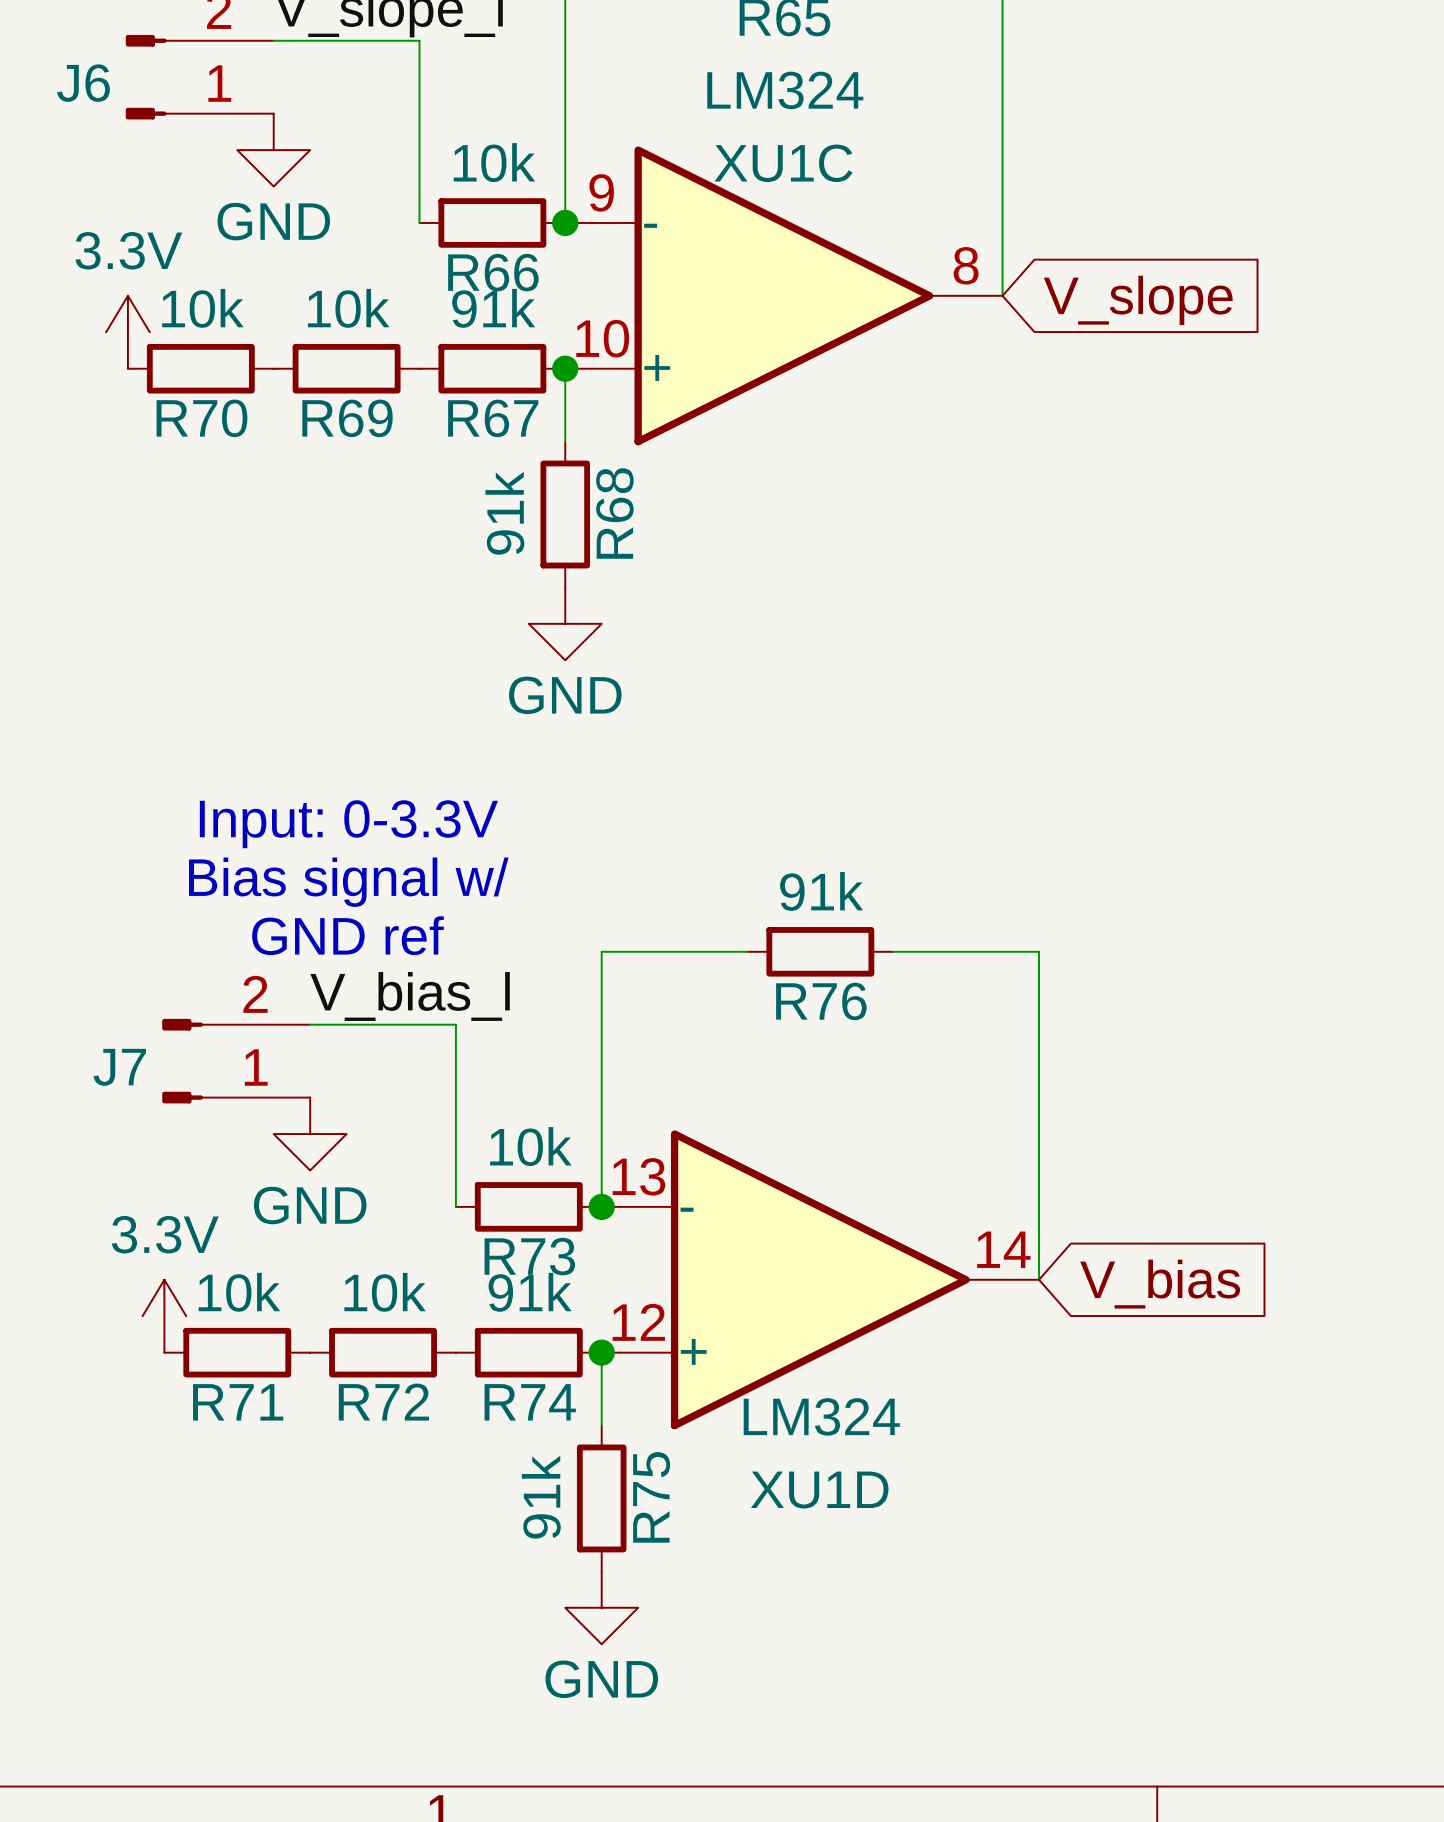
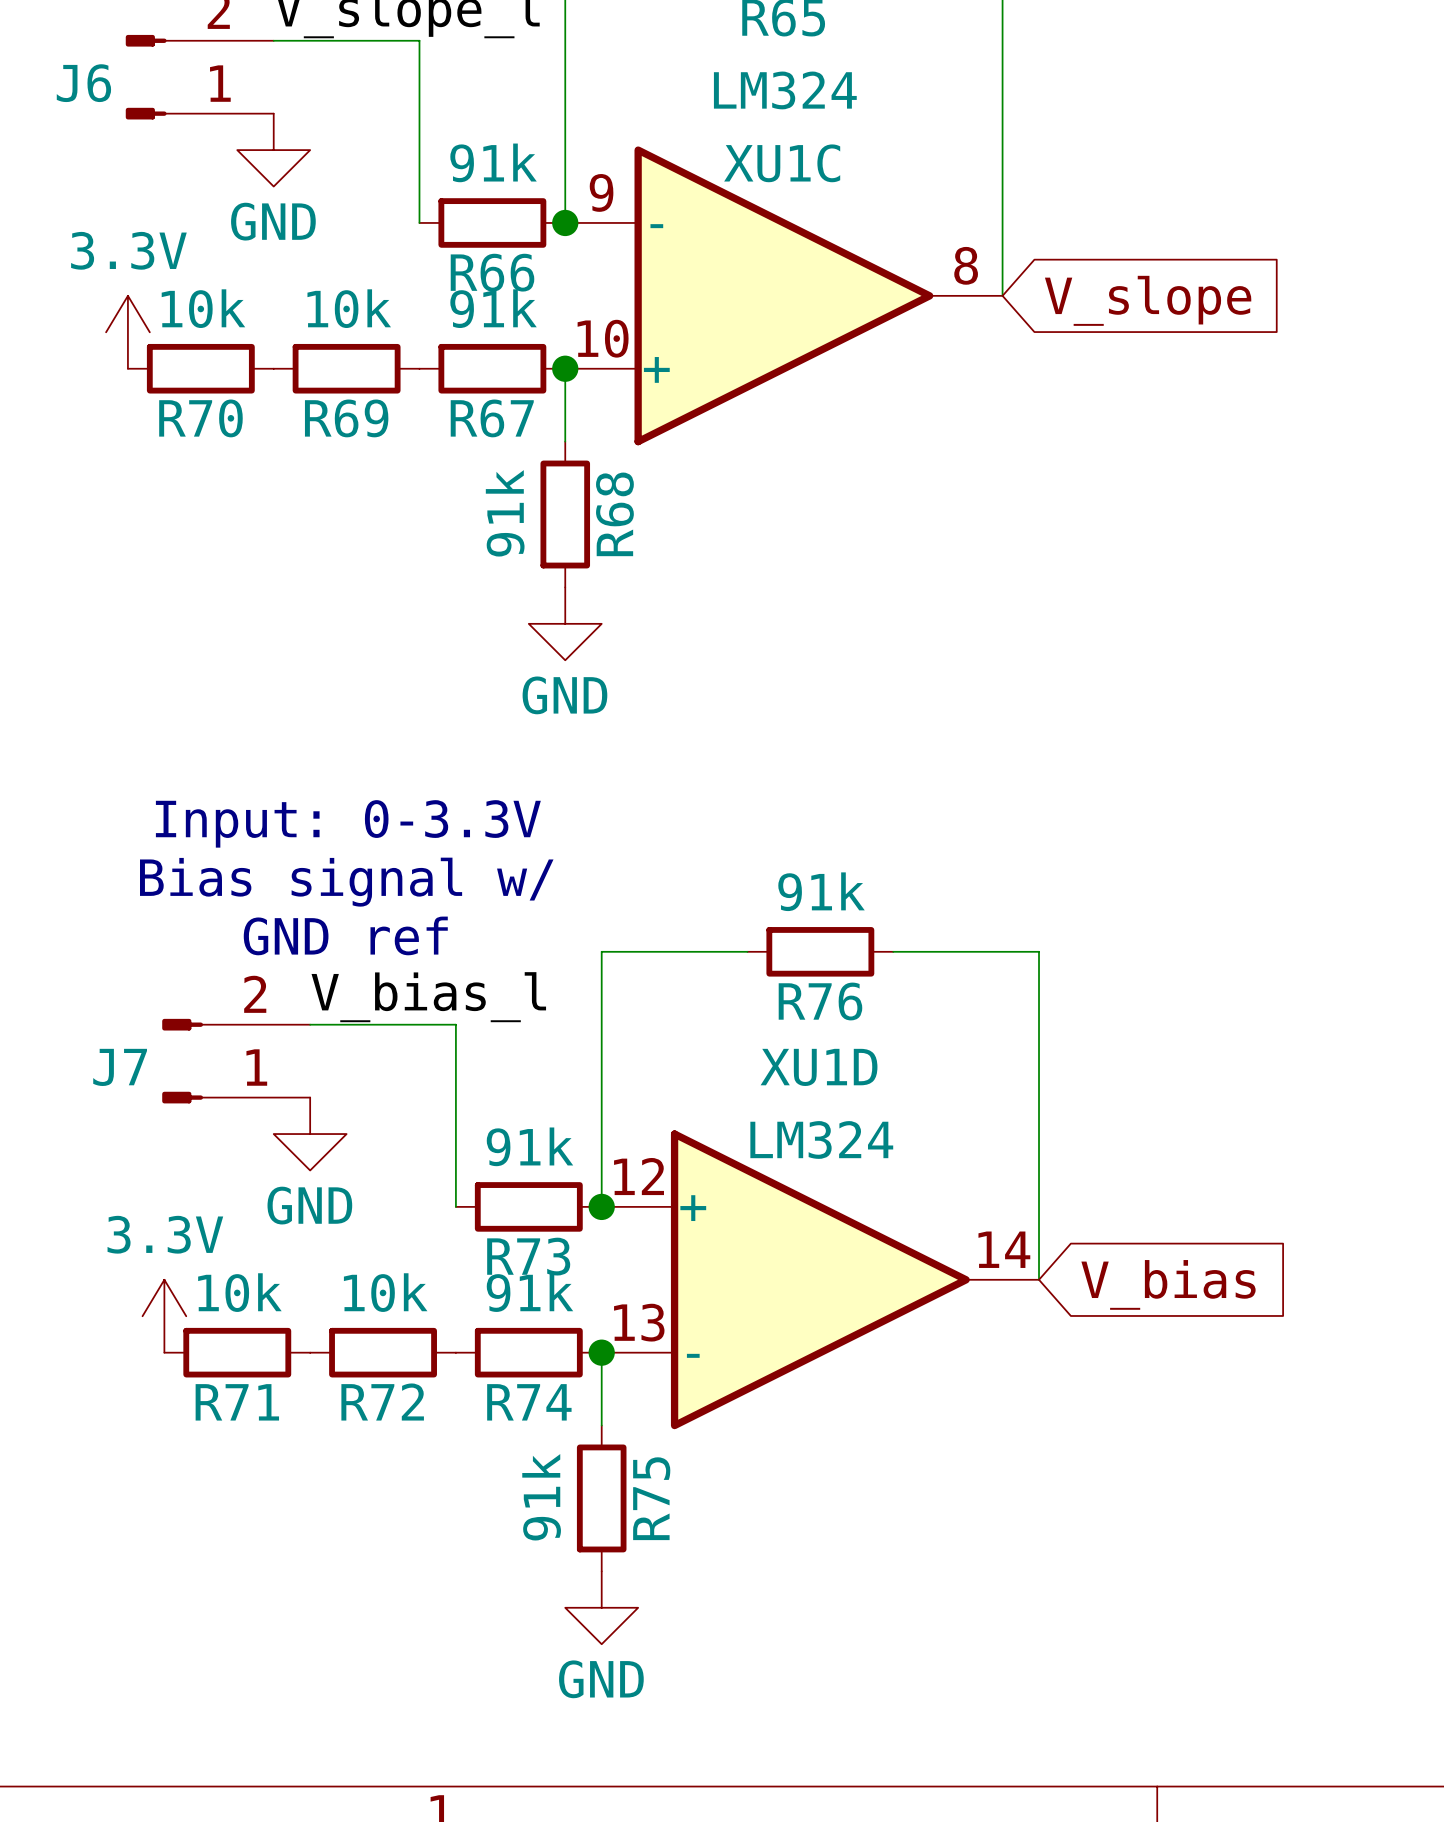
R66 value: 10k (494, 162) -> 91k (493, 162)
R73 value: 10k (530, 1146) -> 91k (529, 1146)
XU1D flip: as is (820, 1279) -> up-down (820, 1279)

